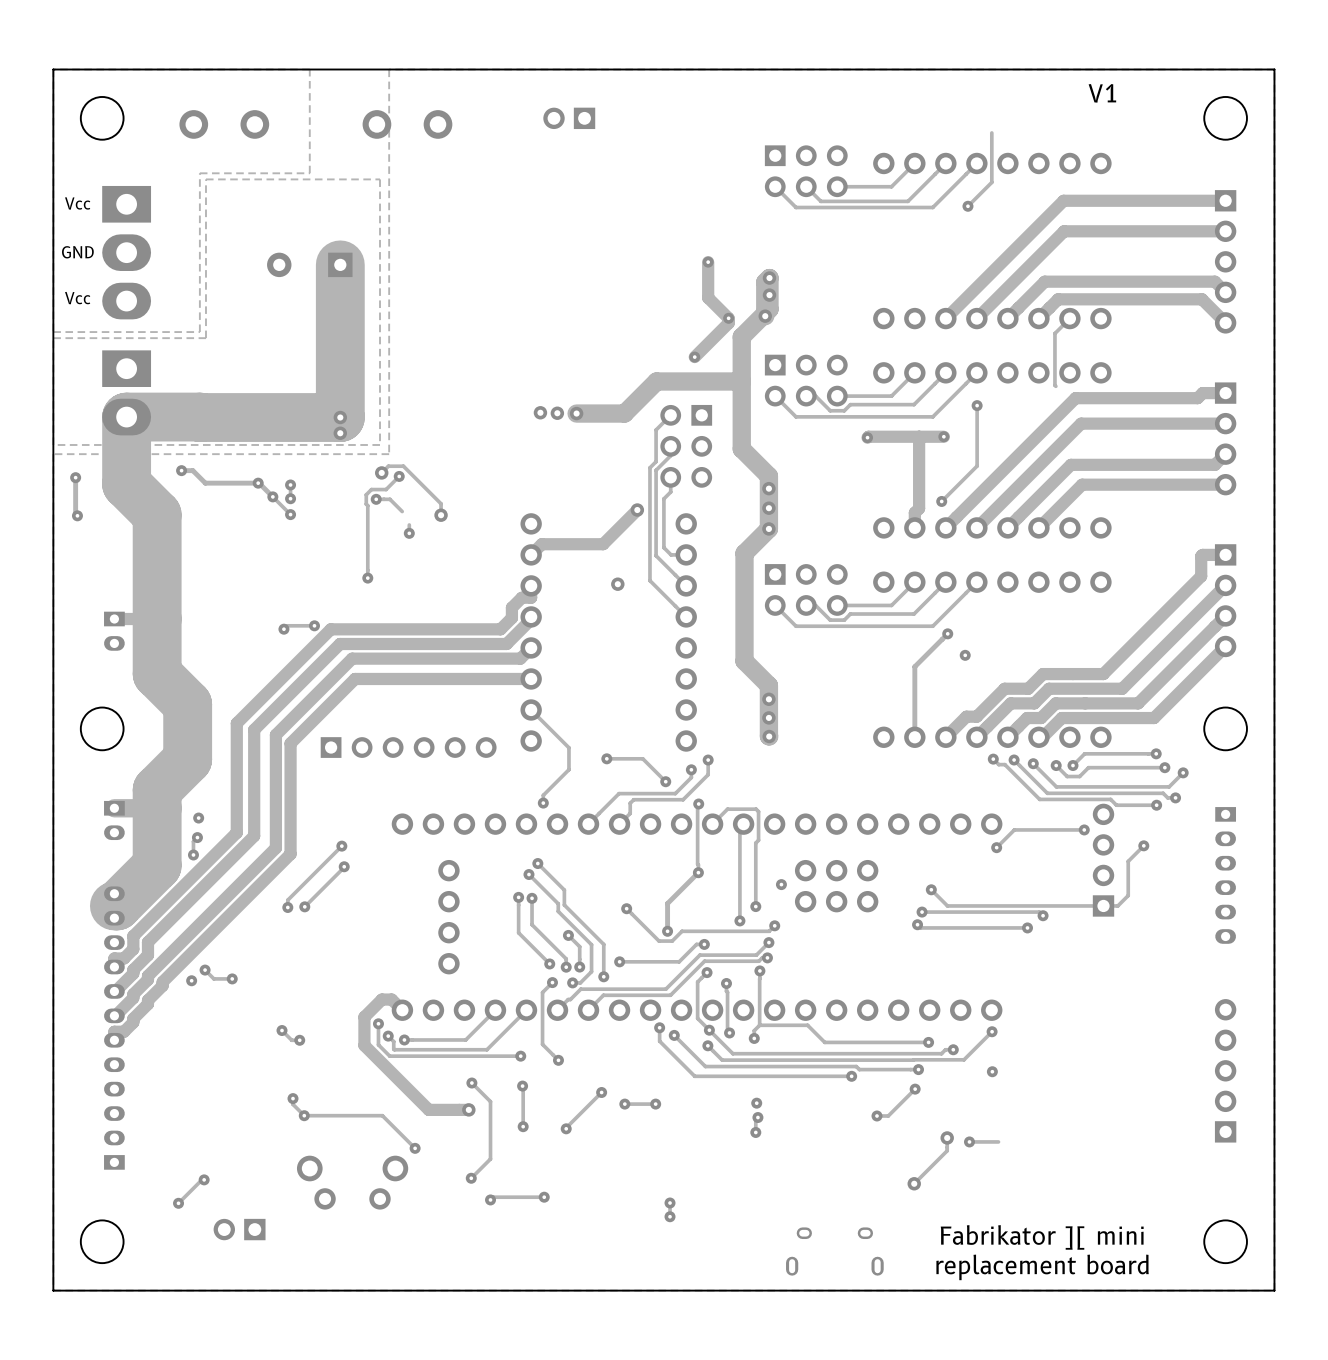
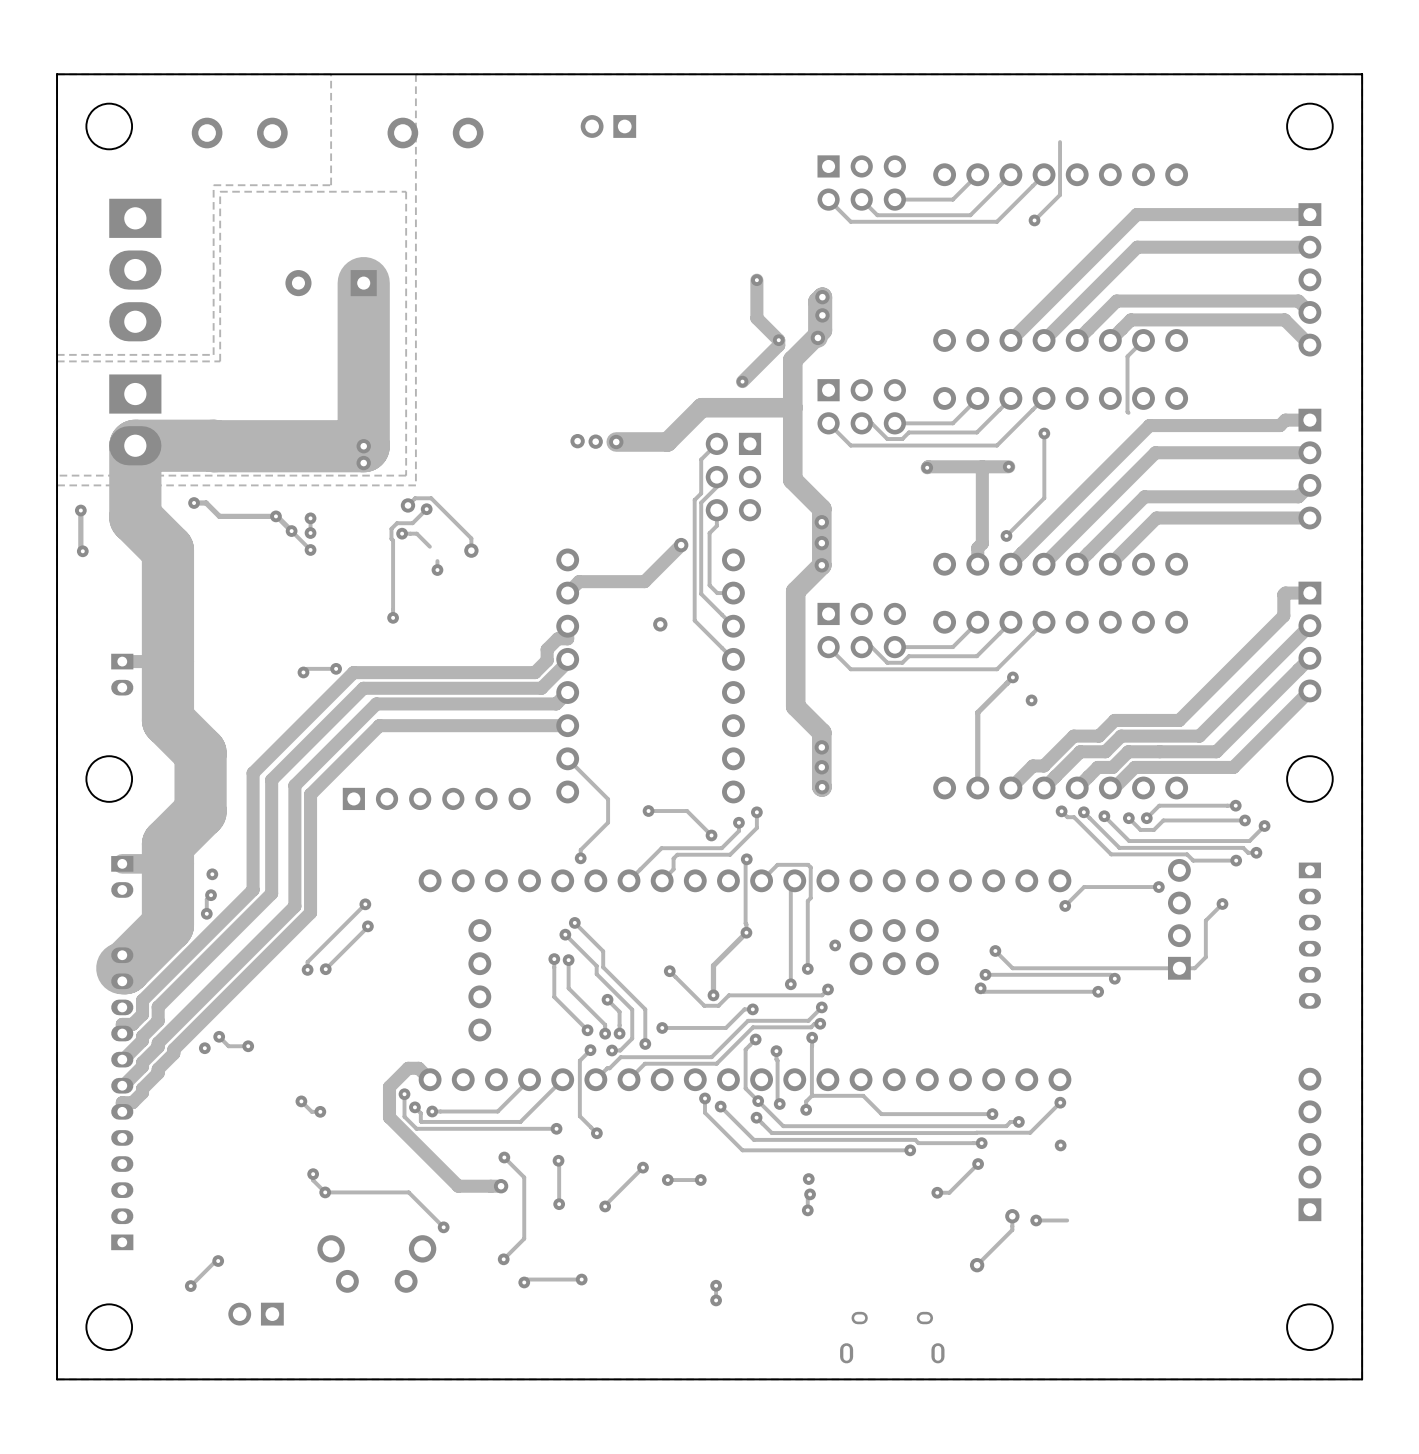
text: V1 (1102, 93) -> none
text: Vcc (77, 203) -> none
text: GND (77, 252) -> none
text: Vcc (77, 298) -> none
text: Fabrikator ][ mini (1042, 1237) -> none
text: replacement board (1042, 1267) -> none

